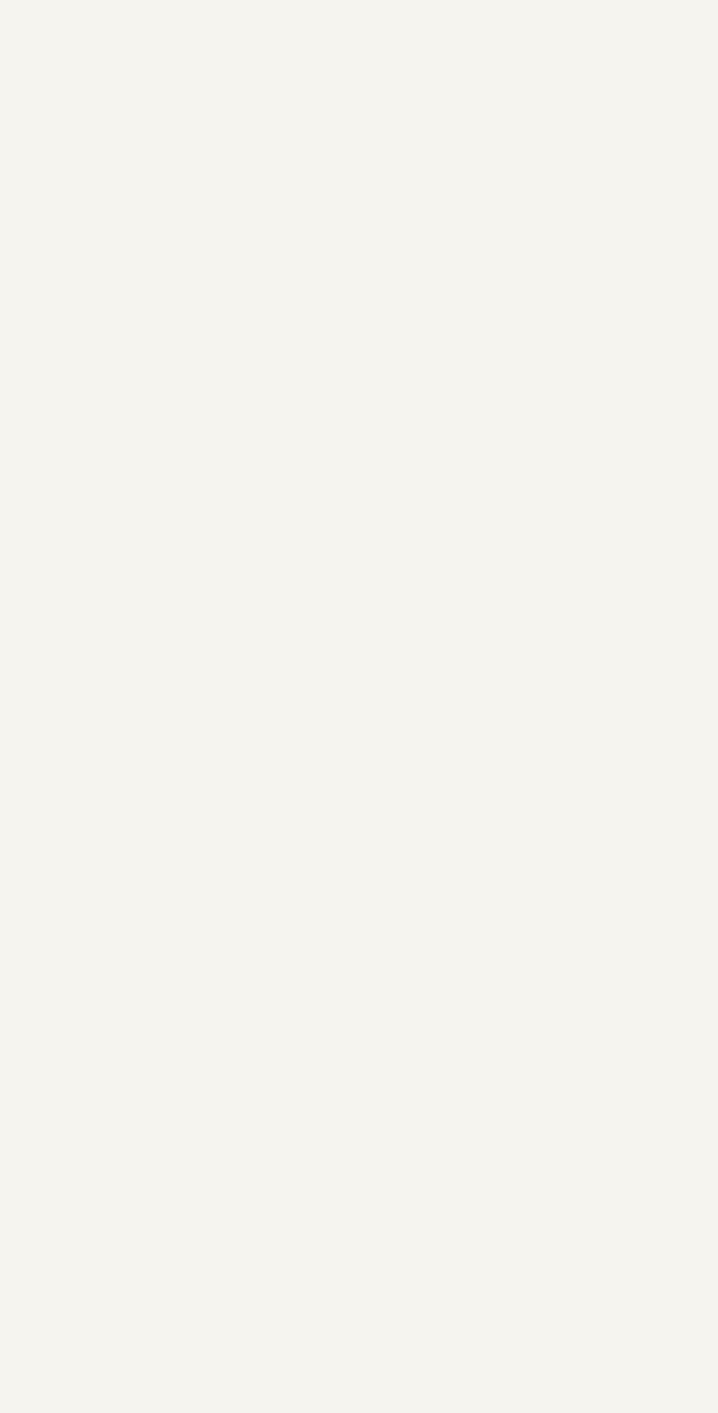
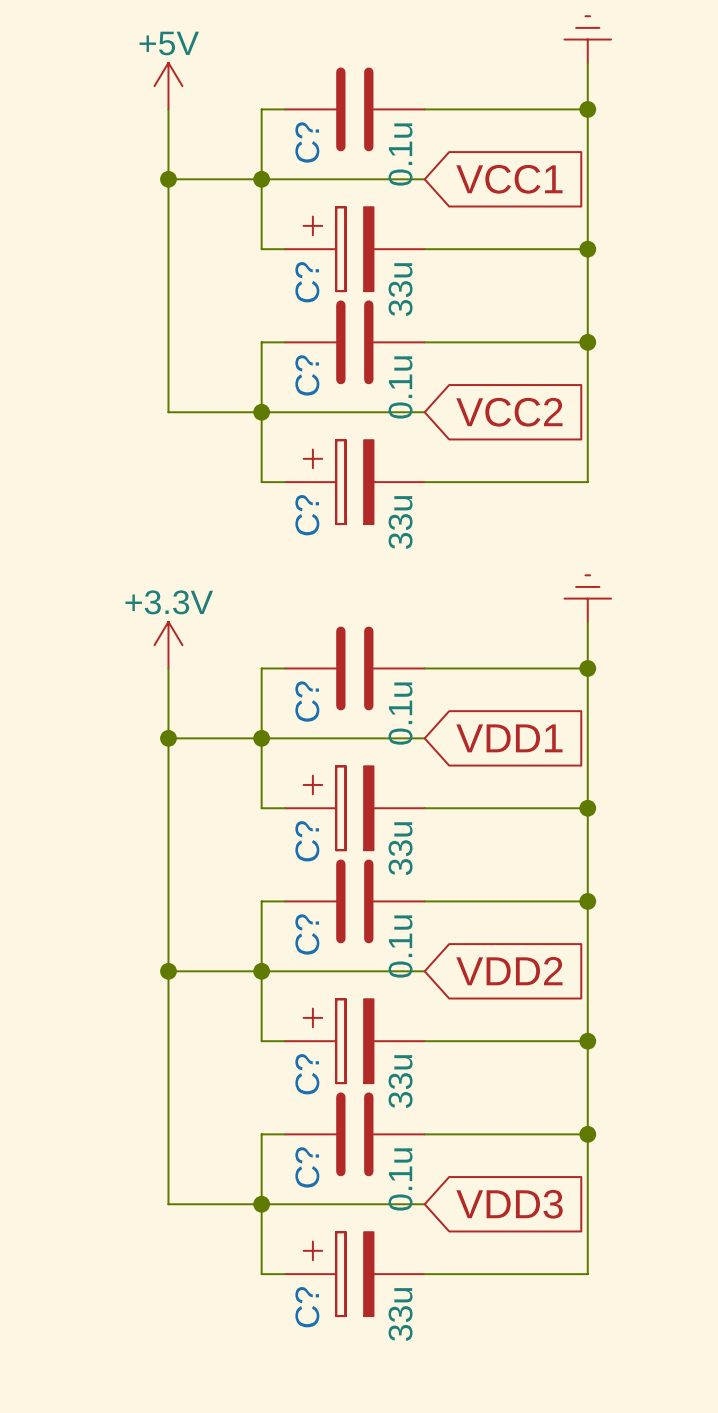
power symbol: none -> (587, 39)
wire: none -> (587, 62) (587, 482) (424, 482)
power symbol: none -> +5V (168, 86)
wire: none -> (168, 109) (168, 412) (424, 412)
wire: none -> (284, 109) (261, 109) (261, 249) (284, 249)
C?: none -> 0.1u (354, 109)
wire: none -> (424, 109) (587, 109)
junction: none -> (587, 109)
wire: none -> (168, 179) (424, 179)
junction: none -> (168, 179)
junction: none -> (261, 179)
global label: none -> VCC1 (509, 179)
C?: none -> 33u (354, 249)
wire: none -> (424, 249) (587, 249)
junction: none -> (587, 249)
wire: none -> (284, 342) (261, 342) (261, 482) (284, 482)
C?: none -> 0.1u (354, 342)
wire: none -> (424, 342) (587, 342)
junction: none -> (587, 342)
junction: none -> (261, 412)
global label: none -> VCC2 (509, 412)
C?: none -> 33u (354, 482)
power symbol: none -> (587, 598)
wire: none -> (587, 621) (587, 1274) (424, 1274)
power symbol: none -> +3.3V (168, 645)
wire: none -> (168, 668) (168, 1204) (424, 1204)
wire: none -> (284, 668) (261, 668) (261, 808) (284, 808)
C?: none -> 0.1u (354, 668)
wire: none -> (424, 668) (587, 668)
junction: none -> (587, 668)
wire: none -> (168, 738) (424, 738)
junction: none -> (168, 738)
junction: none -> (261, 738)
global label: none -> VDD1 (509, 738)
C?: none -> 33u (354, 808)
wire: none -> (424, 808) (587, 808)
junction: none -> (587, 808)
wire: none -> (284, 901) (261, 901) (261, 1041) (284, 1041)
C?: none -> 0.1u (354, 901)
wire: none -> (424, 901) (587, 901)
junction: none -> (587, 901)
wire: none -> (168, 971) (424, 971)
junction: none -> (168, 971)
junction: none -> (261, 971)
global label: none -> VDD2 (509, 971)
C?: none -> 33u (354, 1041)
wire: none -> (424, 1041) (587, 1041)
junction: none -> (587, 1041)
wire: none -> (284, 1134) (261, 1134) (261, 1274) (284, 1274)
C?: none -> 0.1u (354, 1134)
wire: none -> (424, 1134) (587, 1134)
junction: none -> (587, 1134)
junction: none -> (261, 1204)
global label: none -> VDD3 (509, 1204)
C?: none -> 33u (354, 1274)

